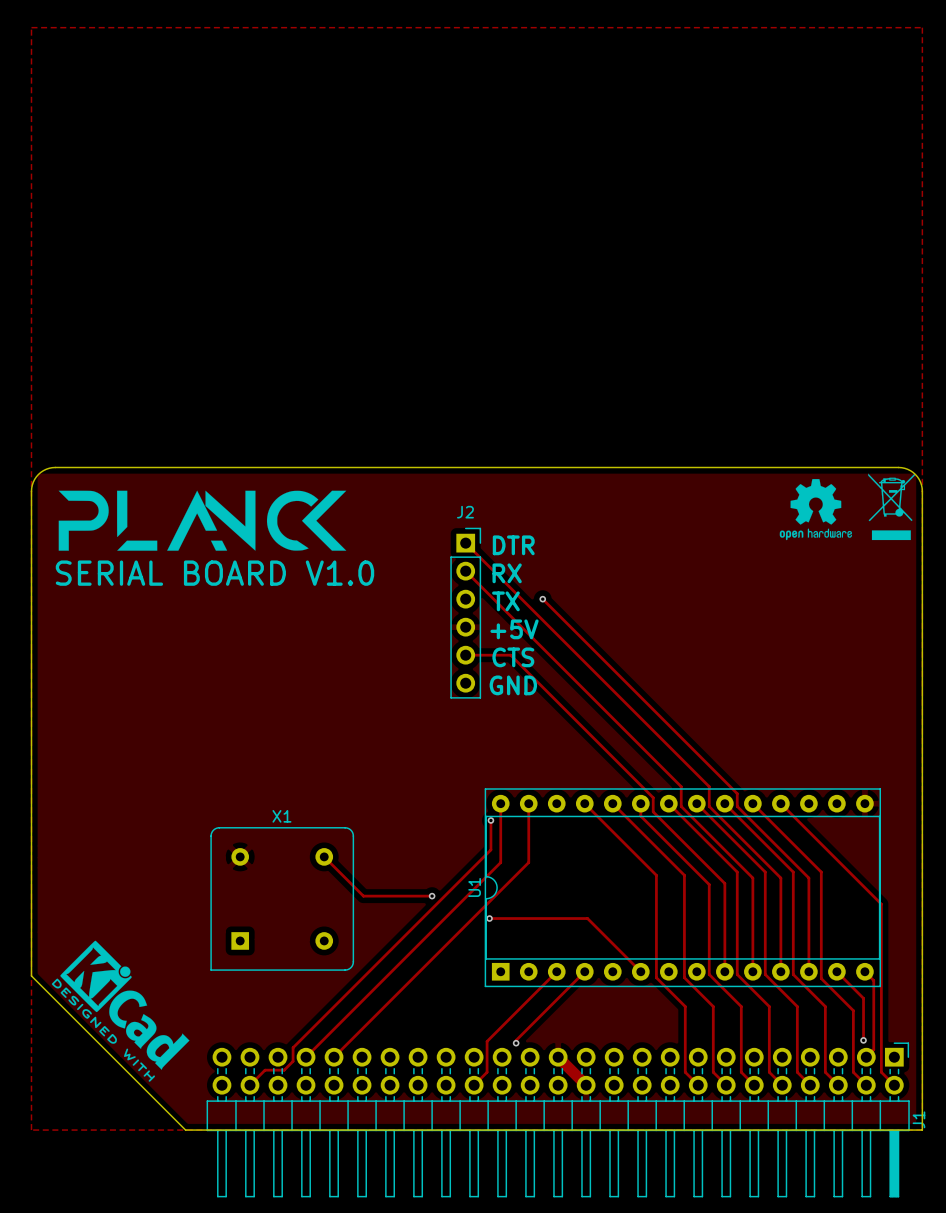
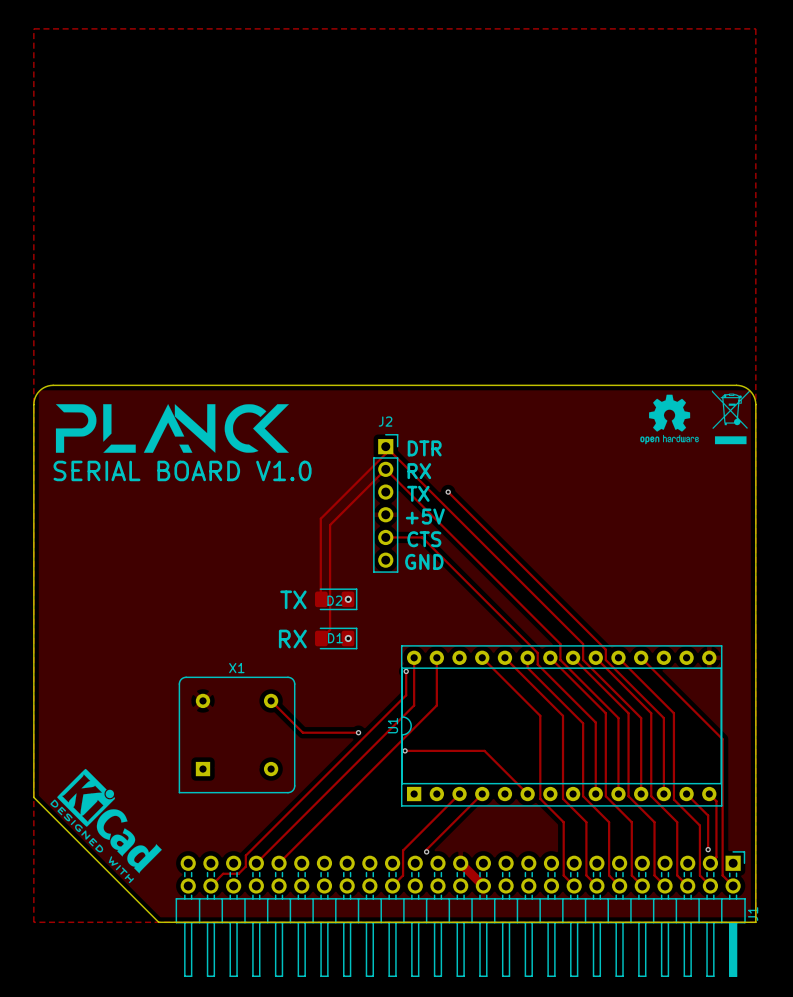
track: none -> (385, 446) (385, 453) (320, 518) (321, 599)
track: none -> (385, 469) (330, 525) (330, 629) (321, 638)
D2: none -> (336, 599)
via: none -> (348, 599)
text: none -> TX (293, 599)
D1: none -> (336, 638)
via: none -> (348, 638)
text: none -> RX (292, 639)

